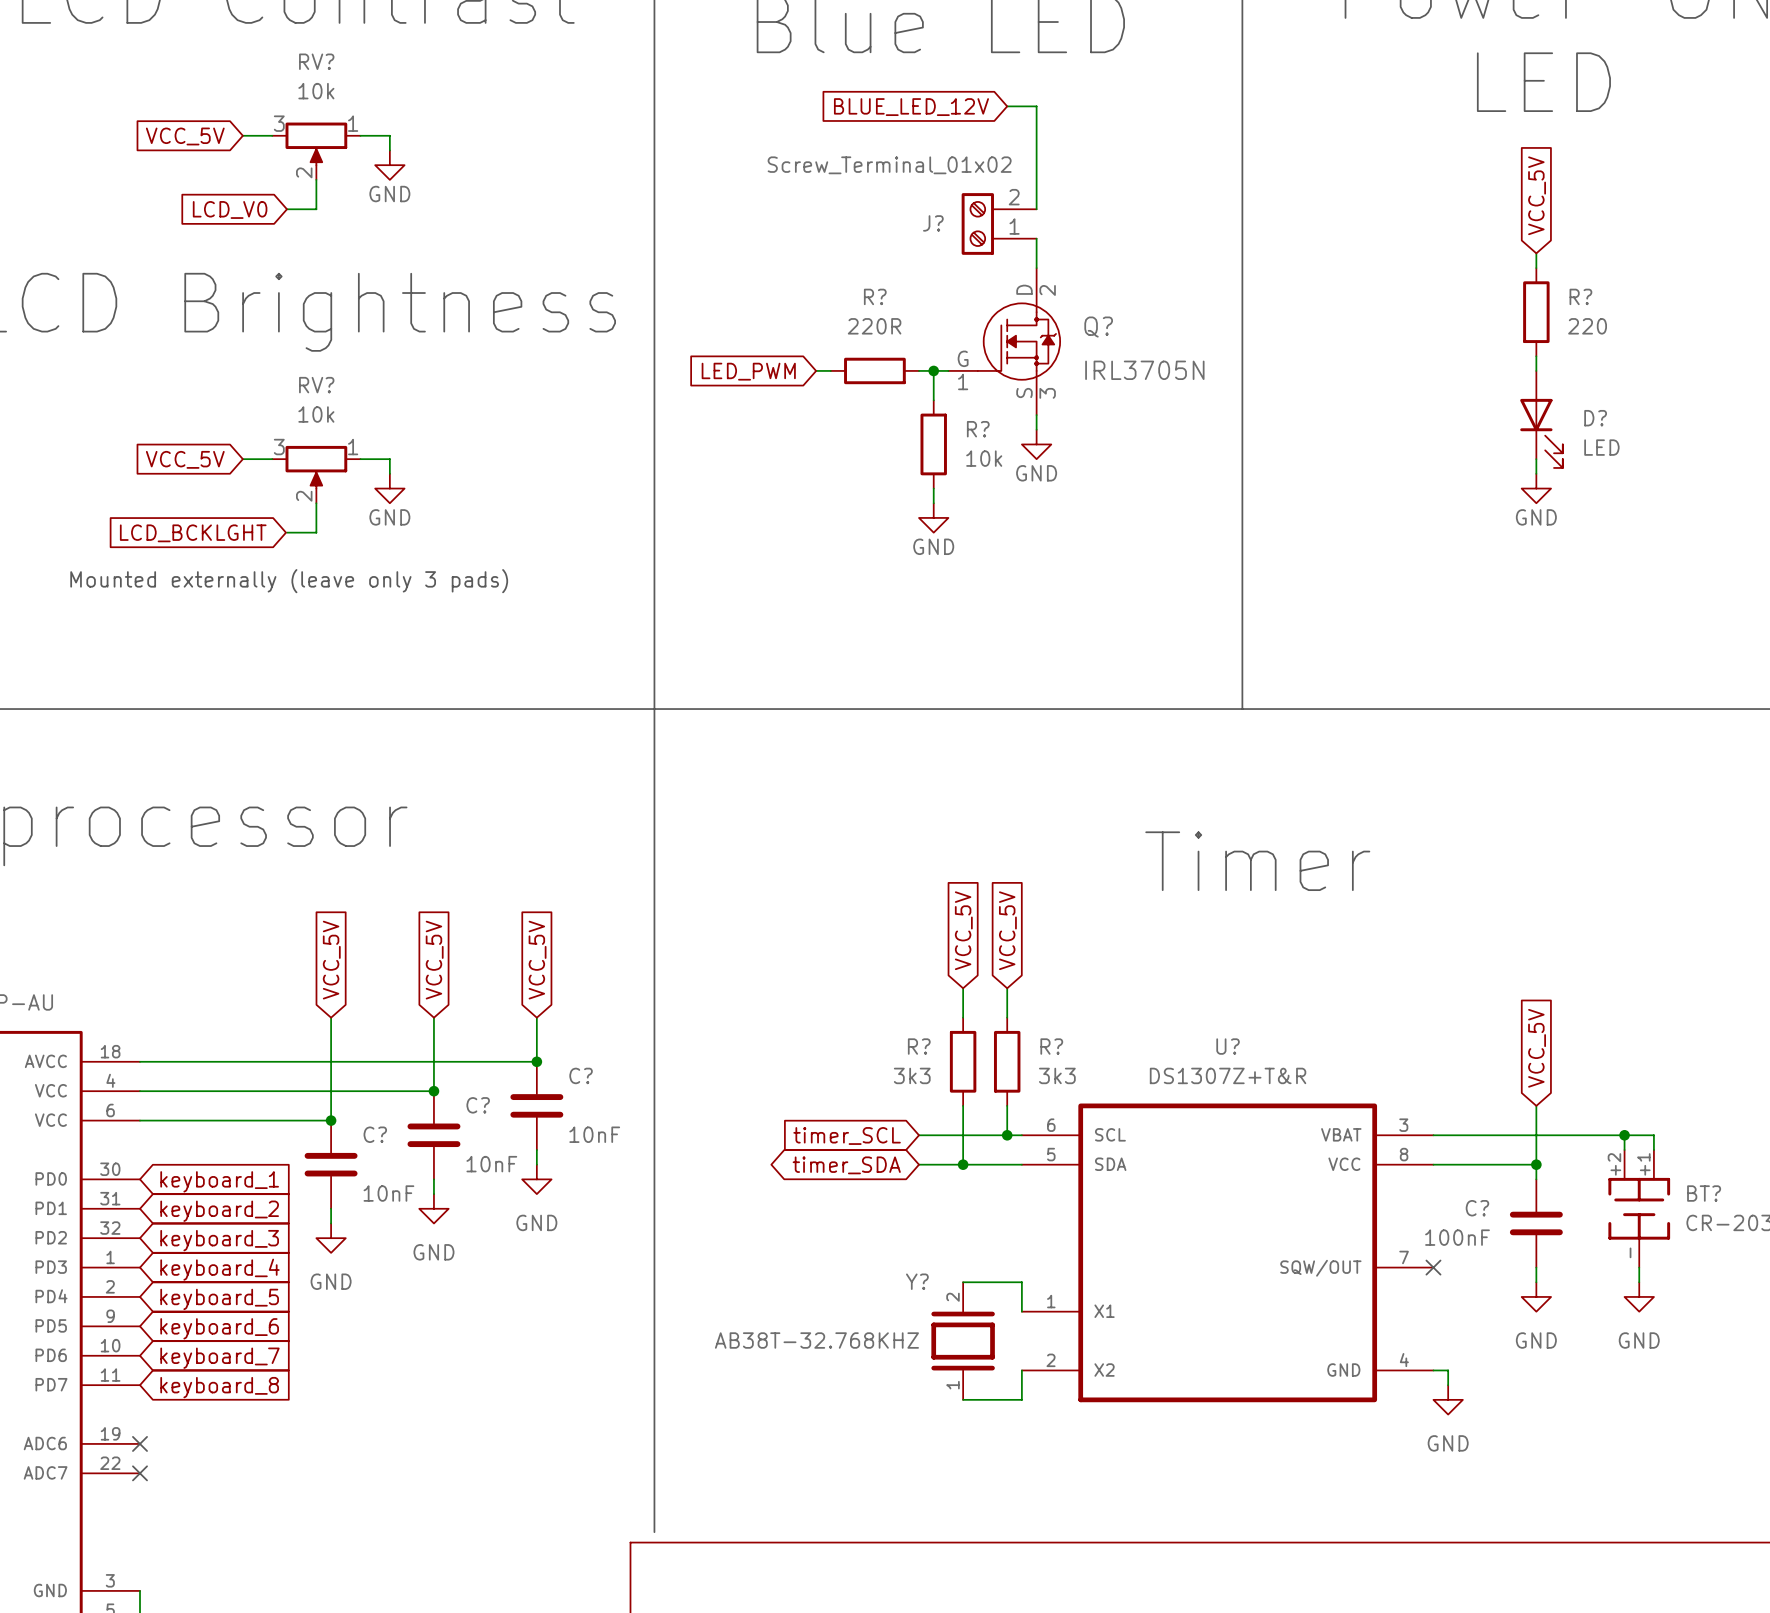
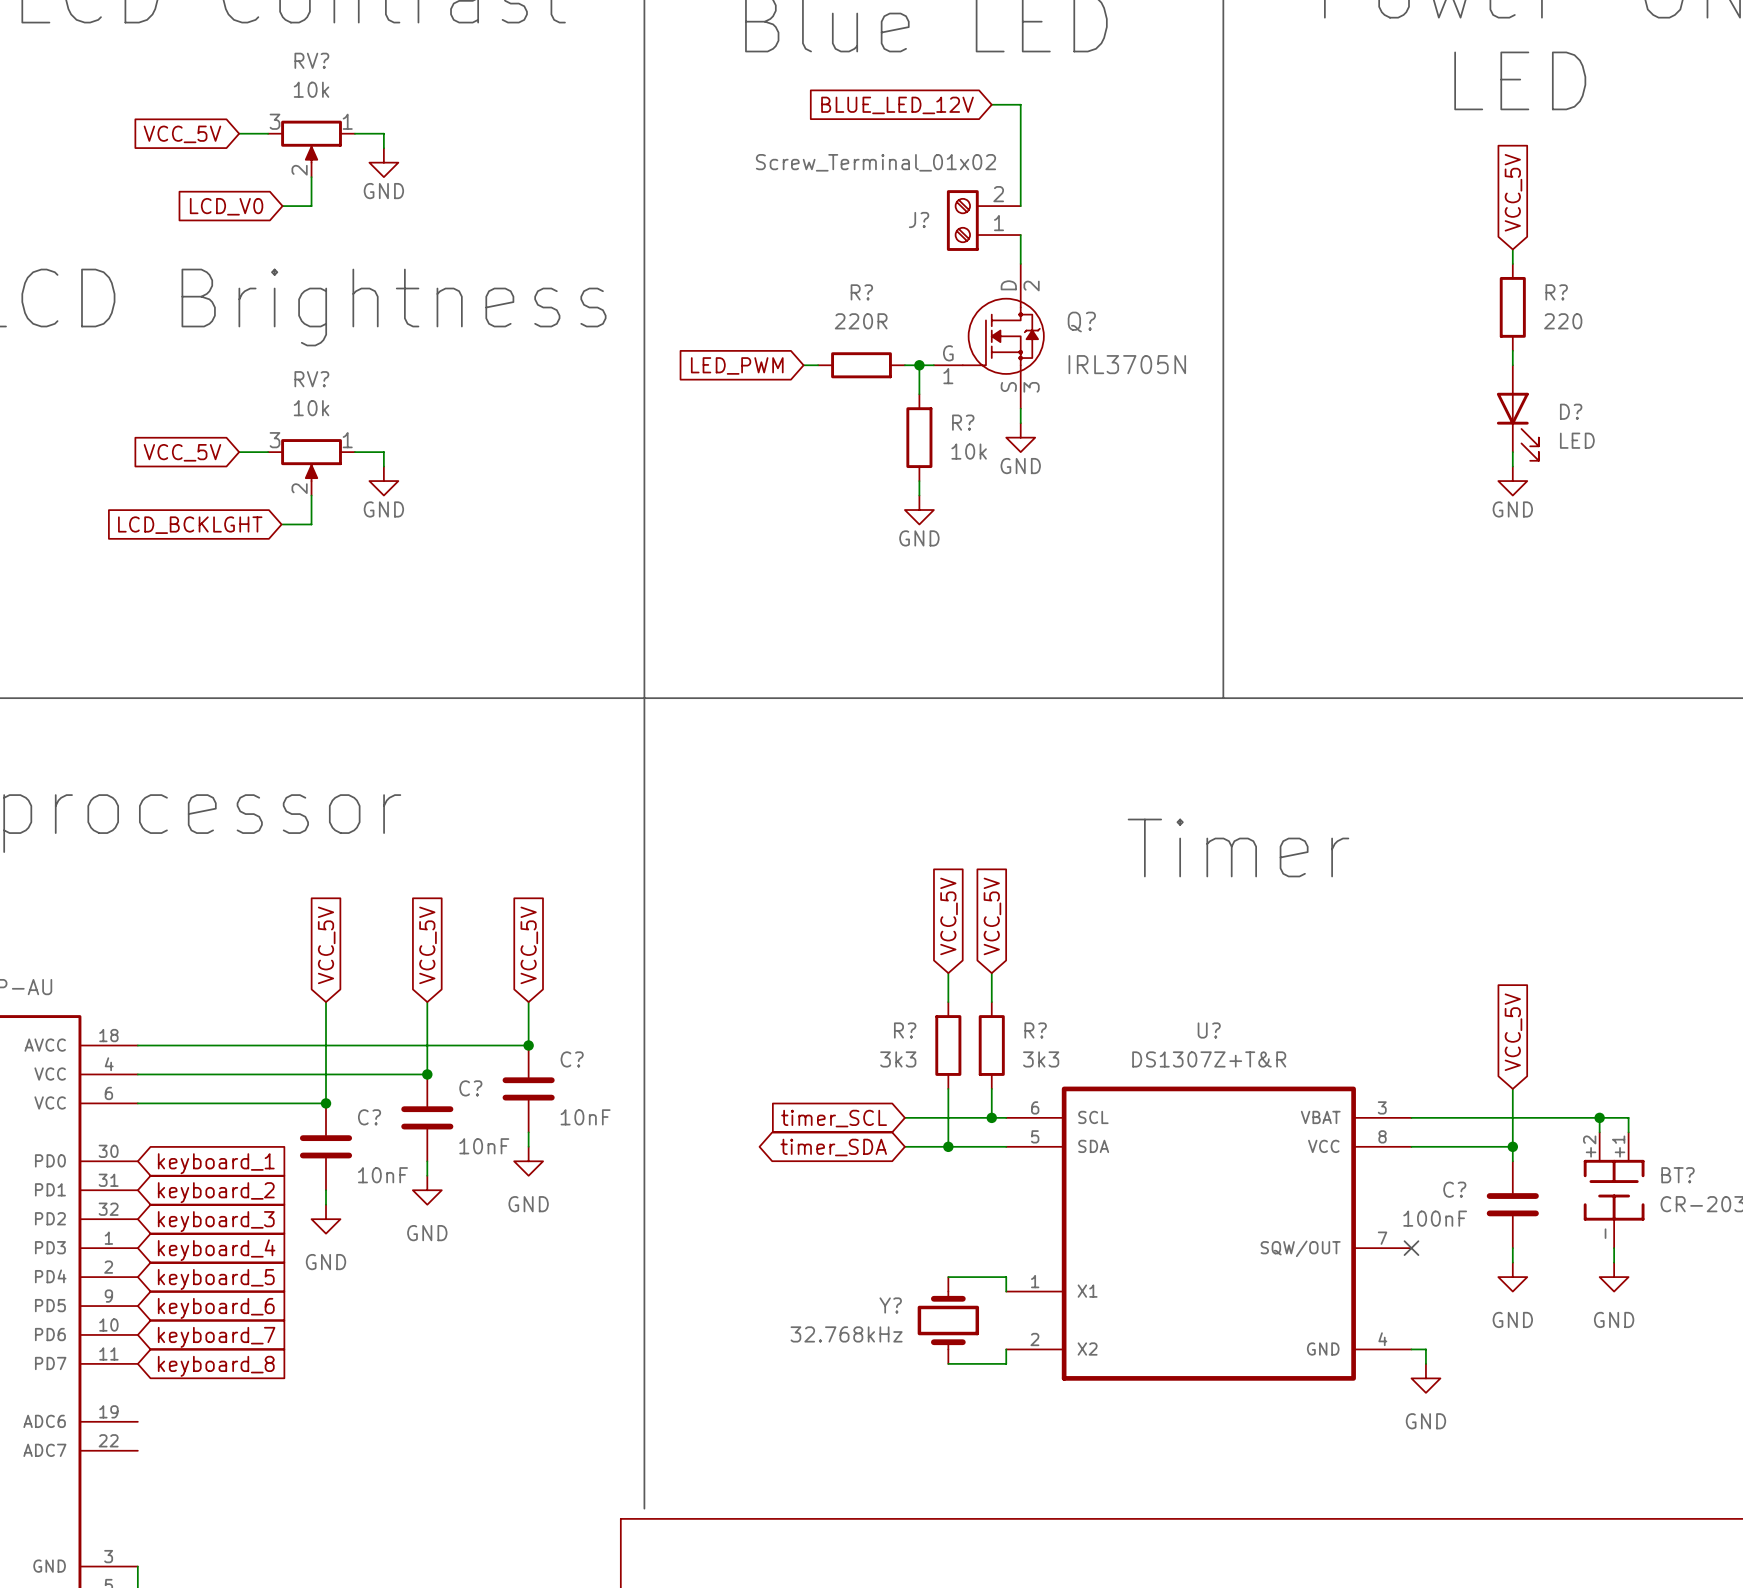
text: Mounted externally (leave only 3 pads) (289, 581) -> none
Y? name position: Y? (917, 1281) -> Y? (890, 1305)
Y? symbol: [931, 1282, 995, 1400] -> [917, 1277, 980, 1364]
wire: (963, 1282) (1021, 1282) (1021, 1296) -> (948, 1277) (1006, 1277)
Y? value: AB38T-32.768KHZ (816, 1340) -> 32.768kHz (846, 1334)
wire: (1021, 1385) (1021, 1399) (963, 1399) -> (1006, 1363) (948, 1363)
no-connect mark: (140, 1443) -> none
no-connect mark: (140, 1473) -> none

